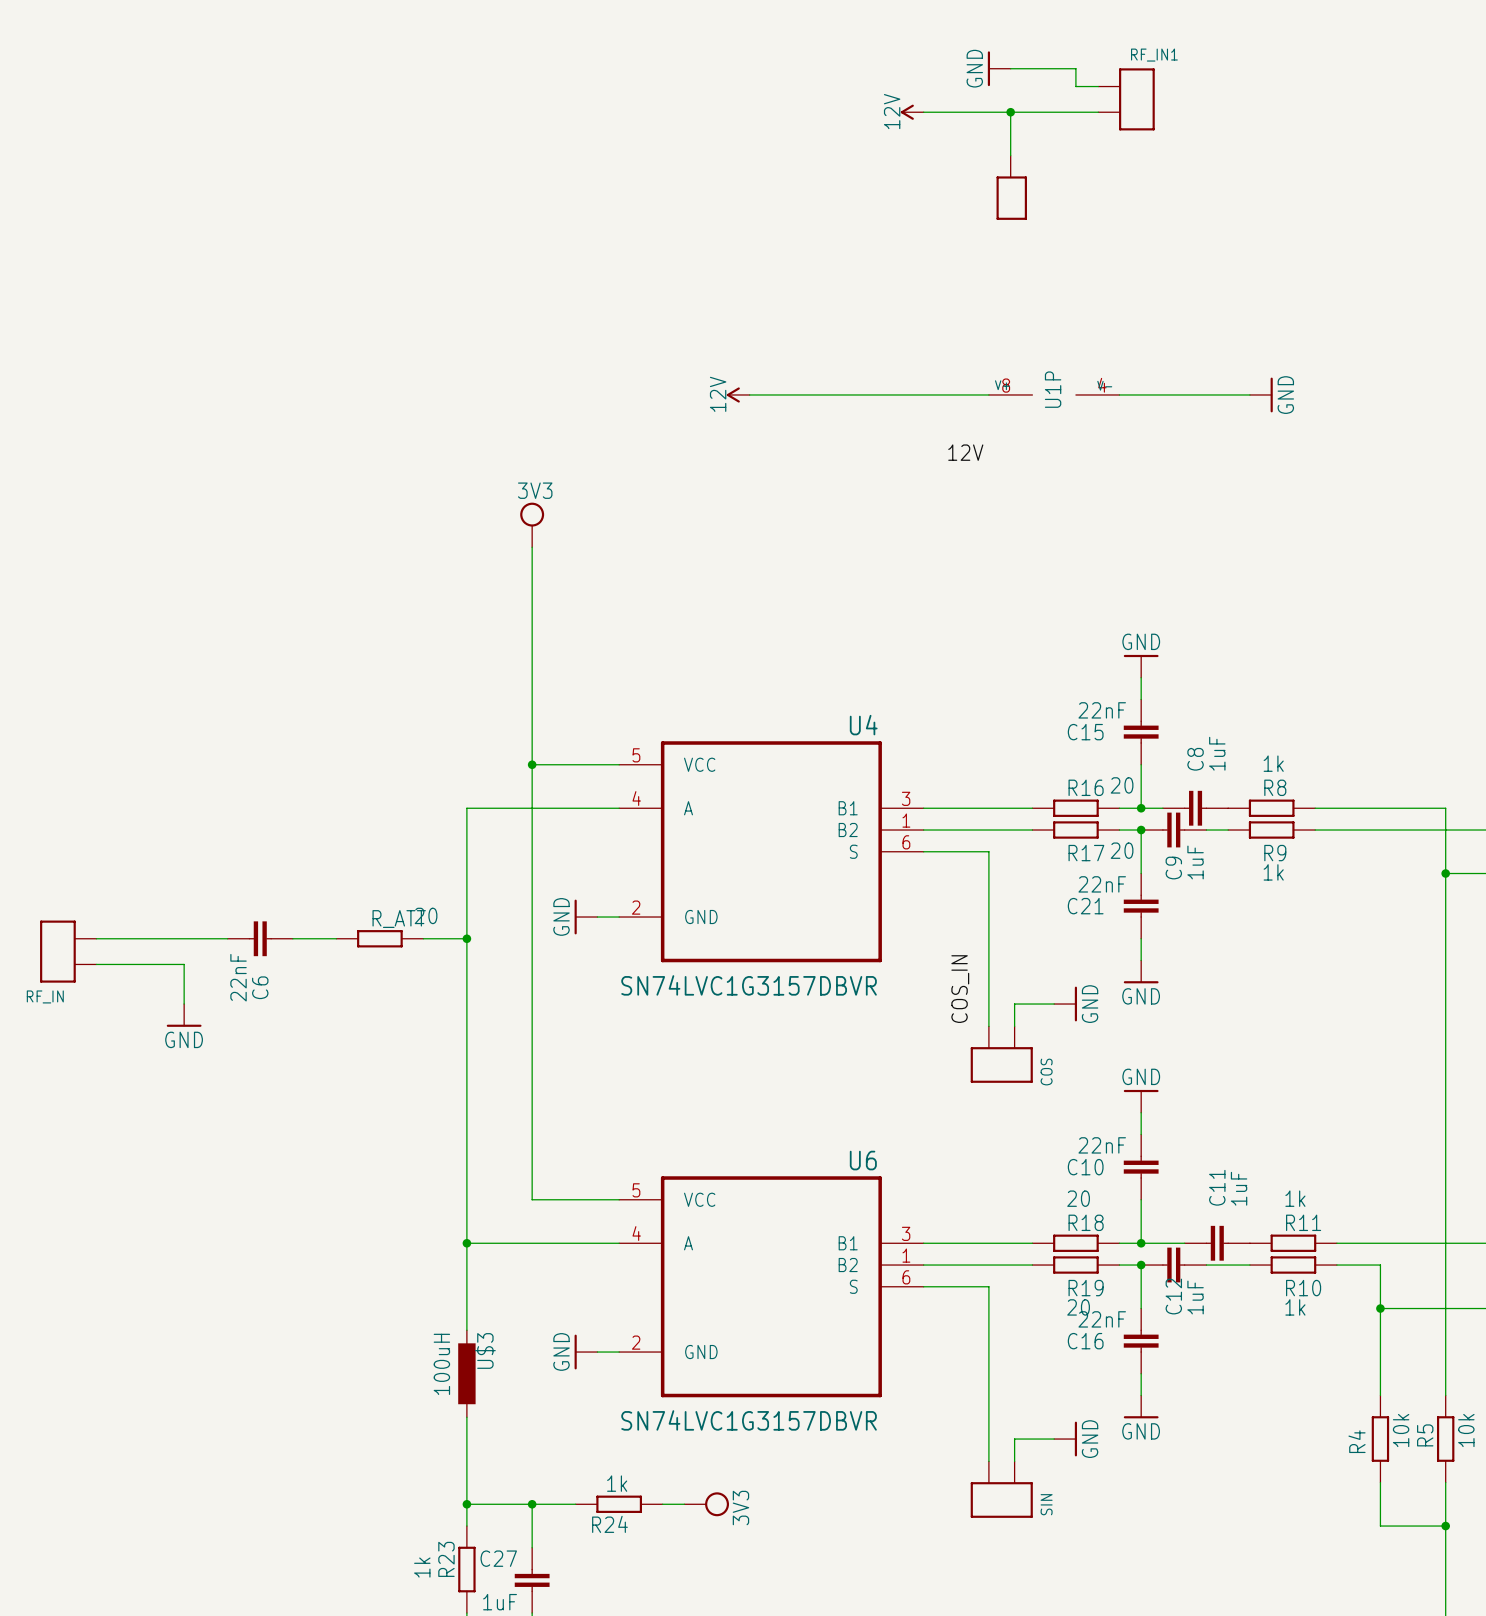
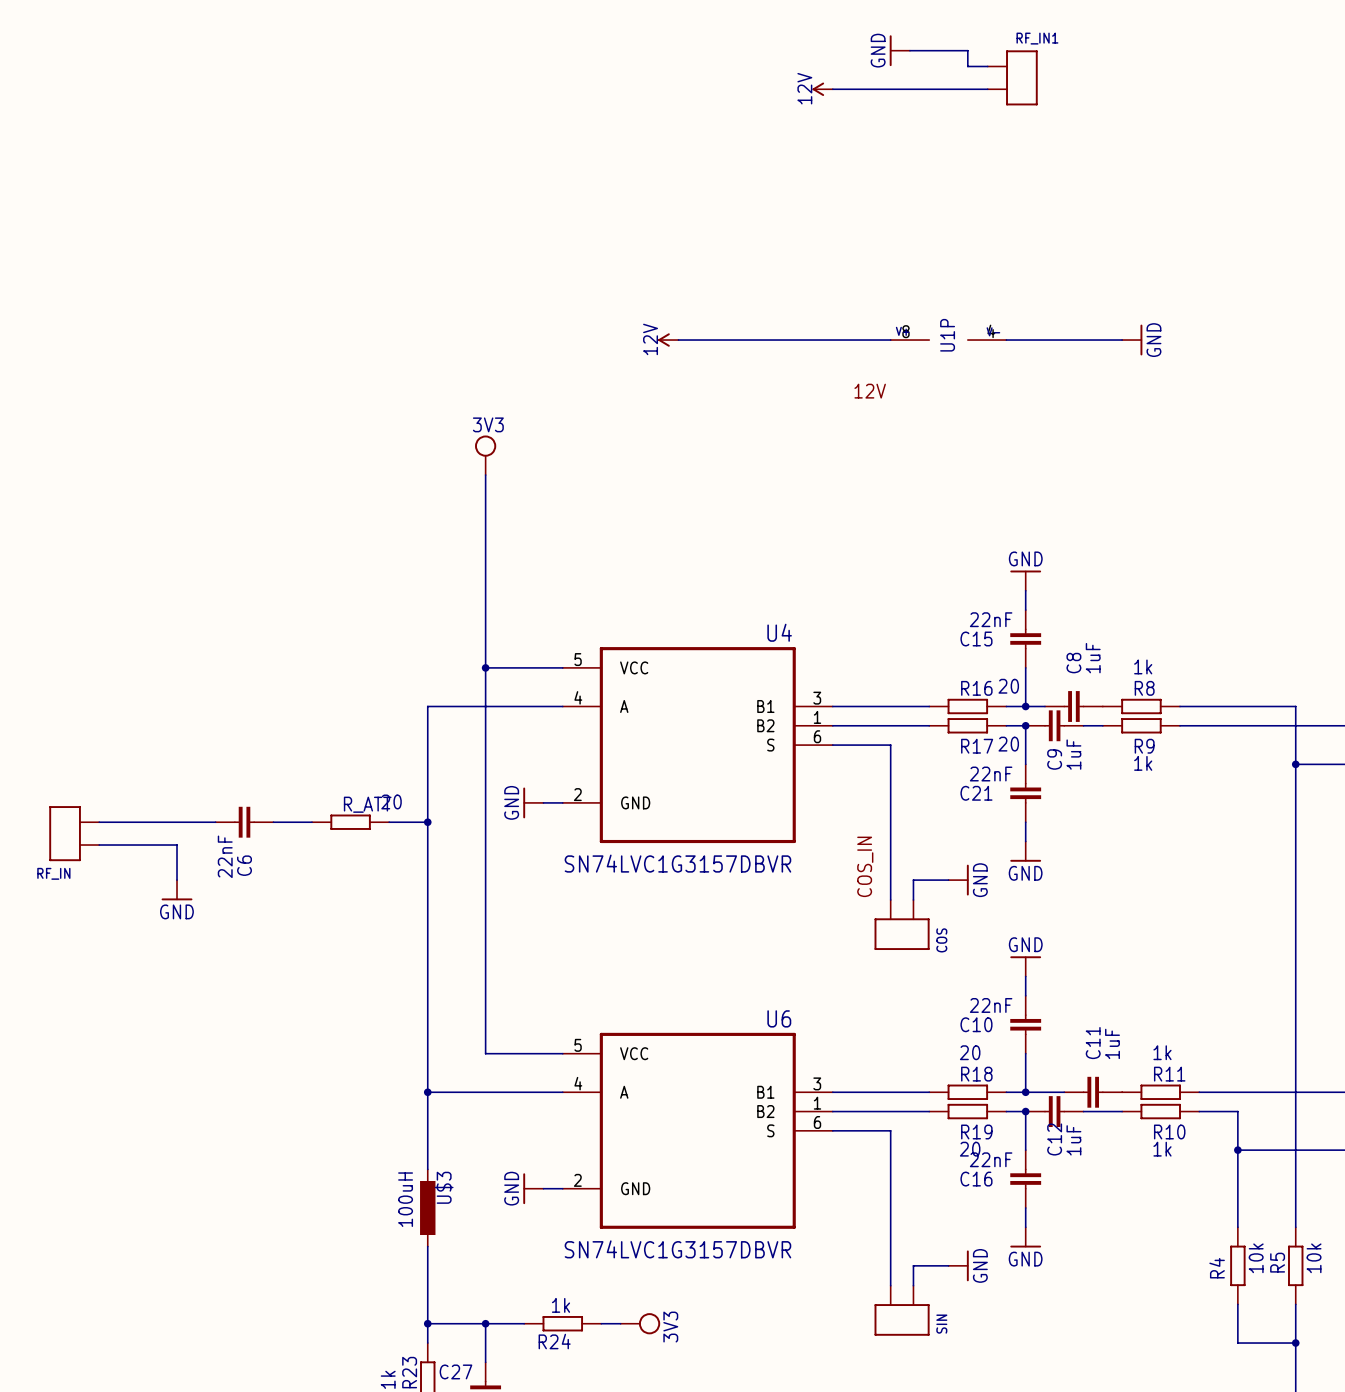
wire: (1010, 112) (1010, 155) -> none
junction: (1010, 112) -> none
part: (1011, 187) -> none

